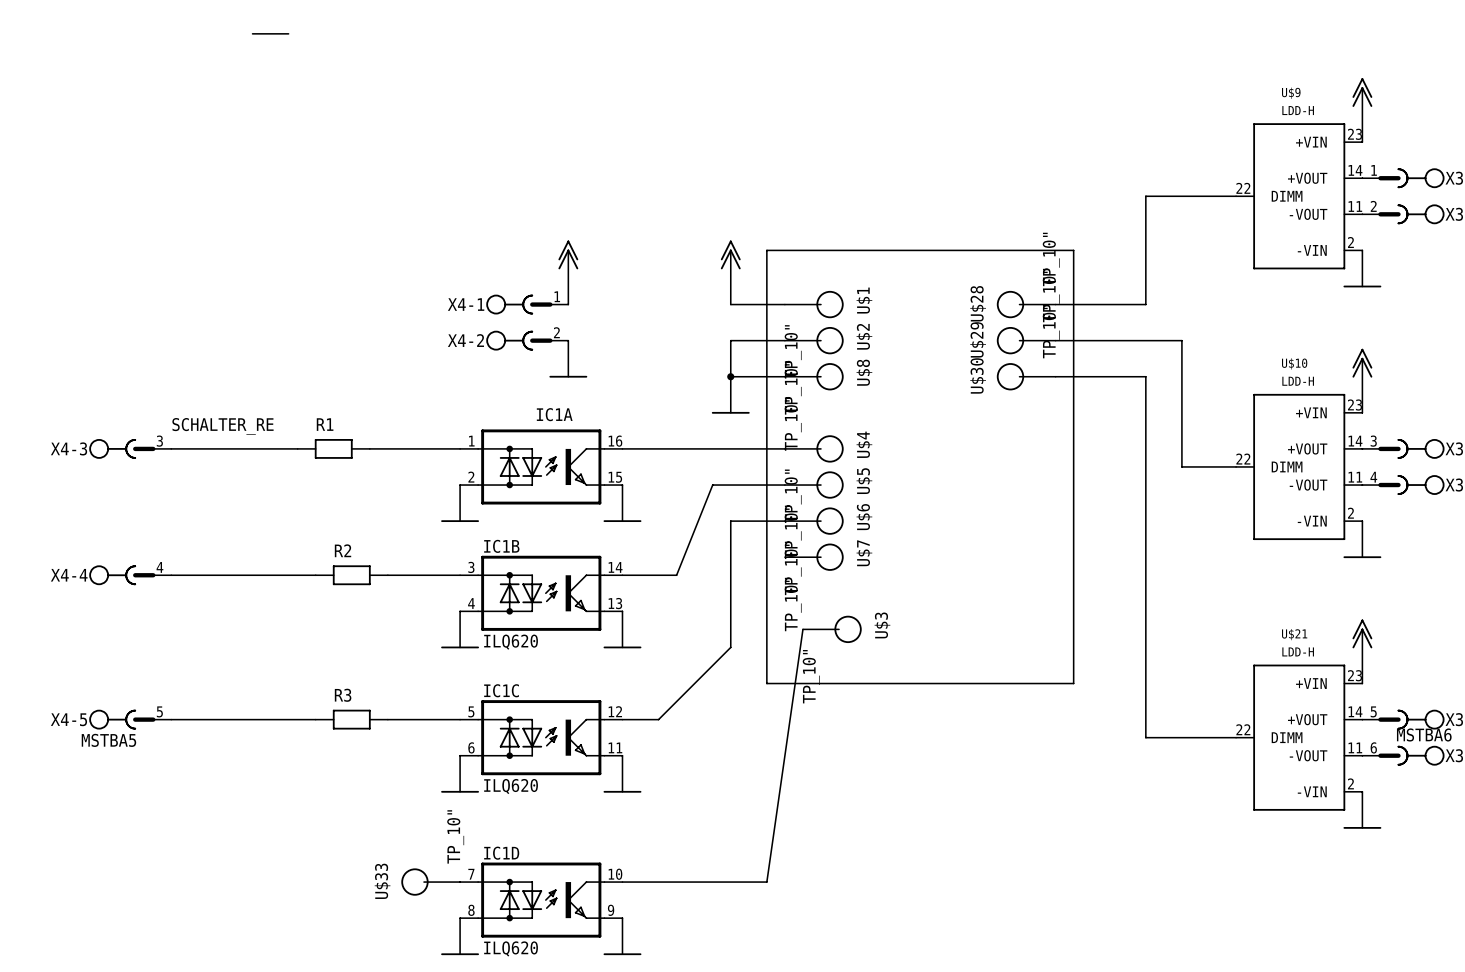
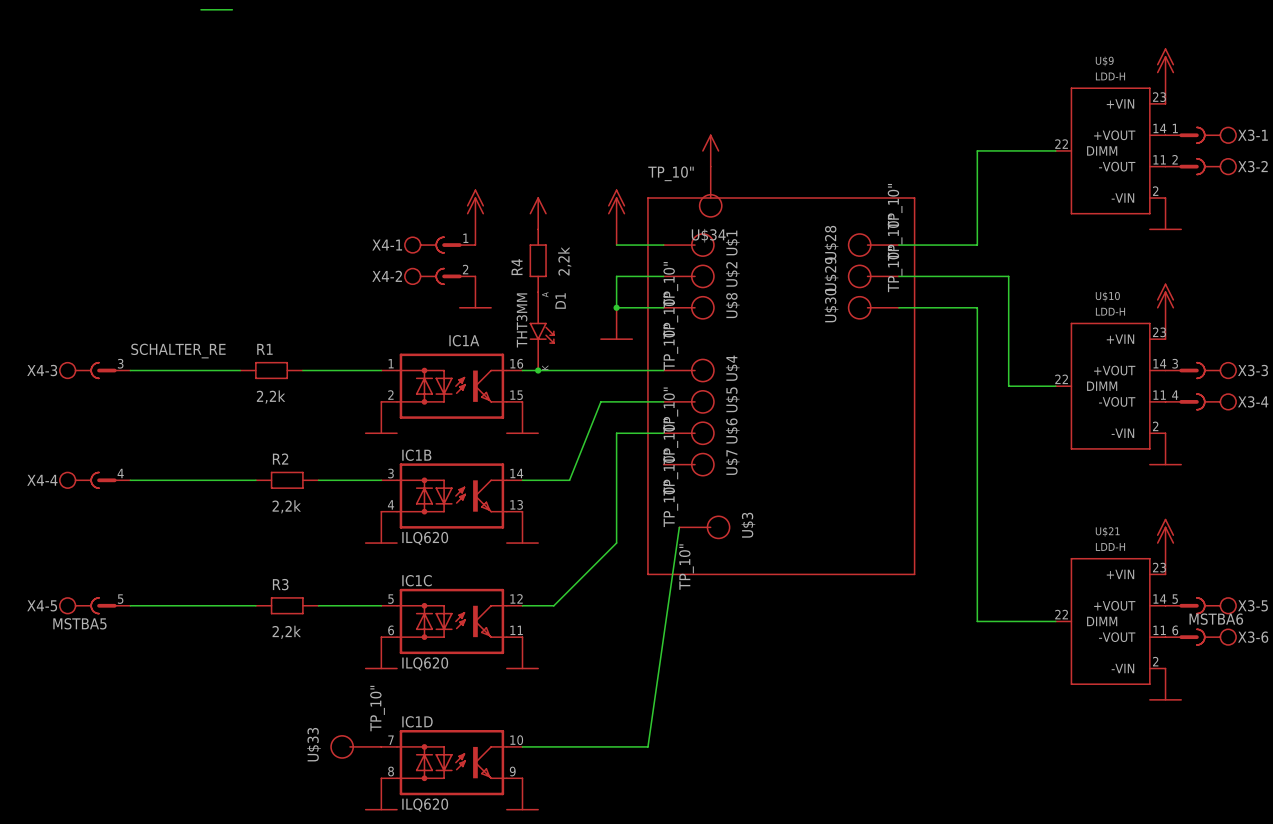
power symbol: none -> (710, 150)
U$34: none -> TP_10" (710, 192)
power symbol: none -> (538, 213)
R4: none -> 2,2k (538, 260)
D1: none -> THT3MM (541, 331)
junction: none -> (538, 370)
R1 value: none -> 2,2k (271, 397)
R2 value: none -> 2,2k (286, 506)
R3 value: none -> 2,2k (286, 632)

